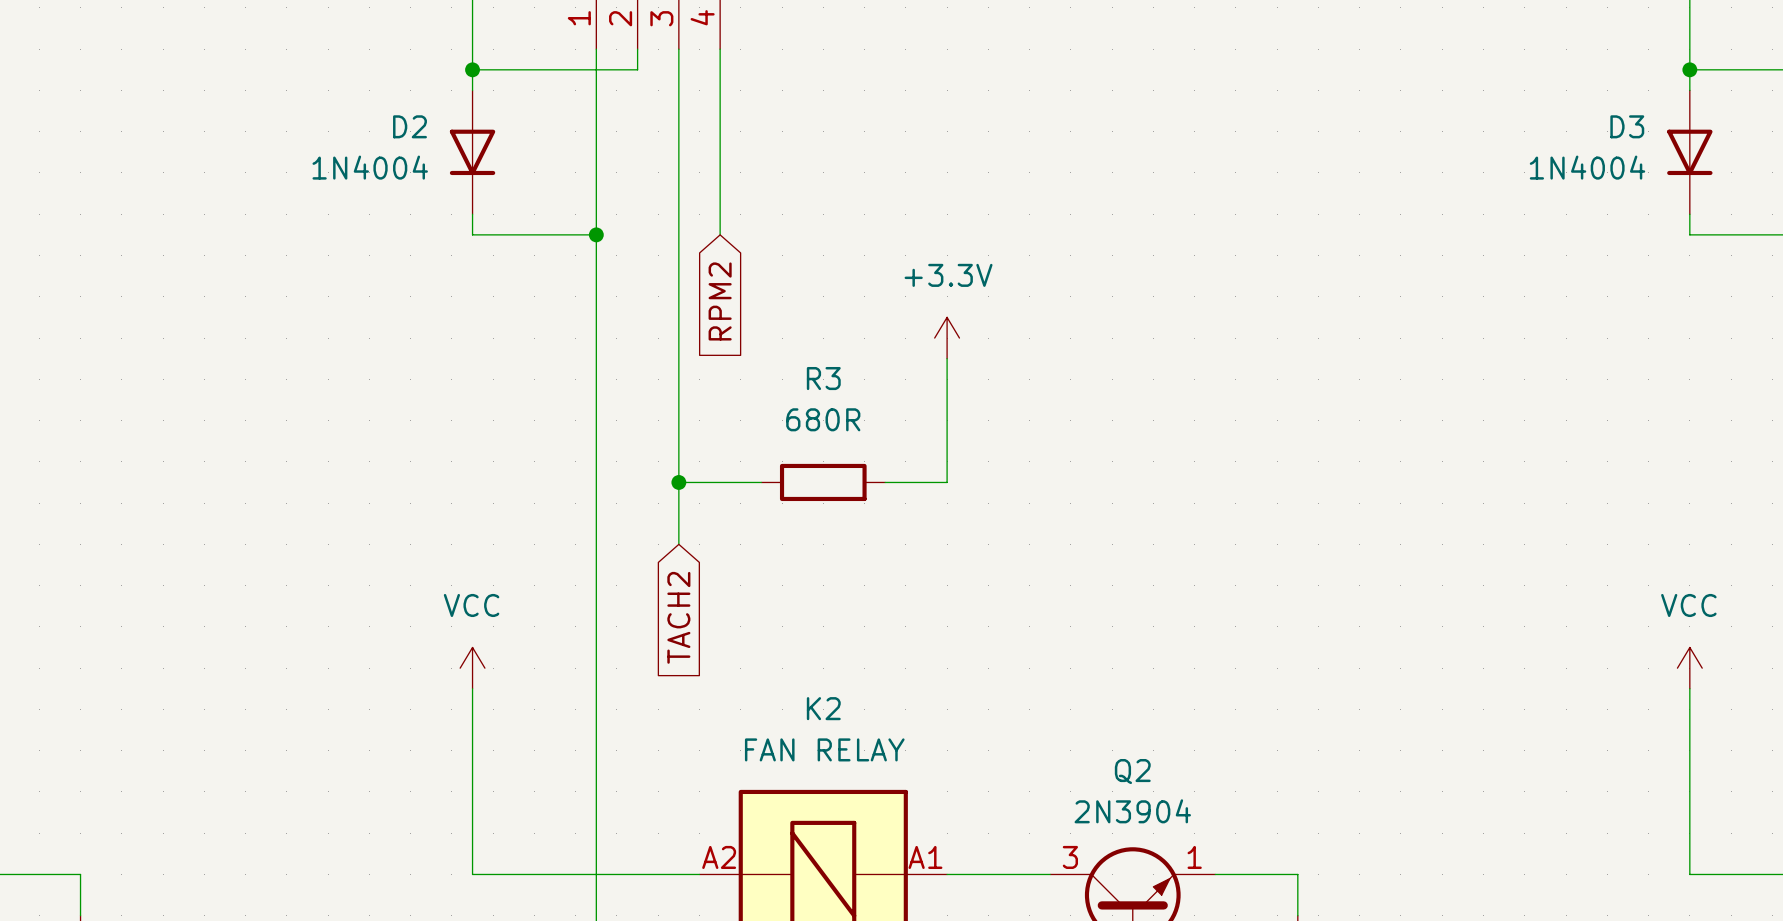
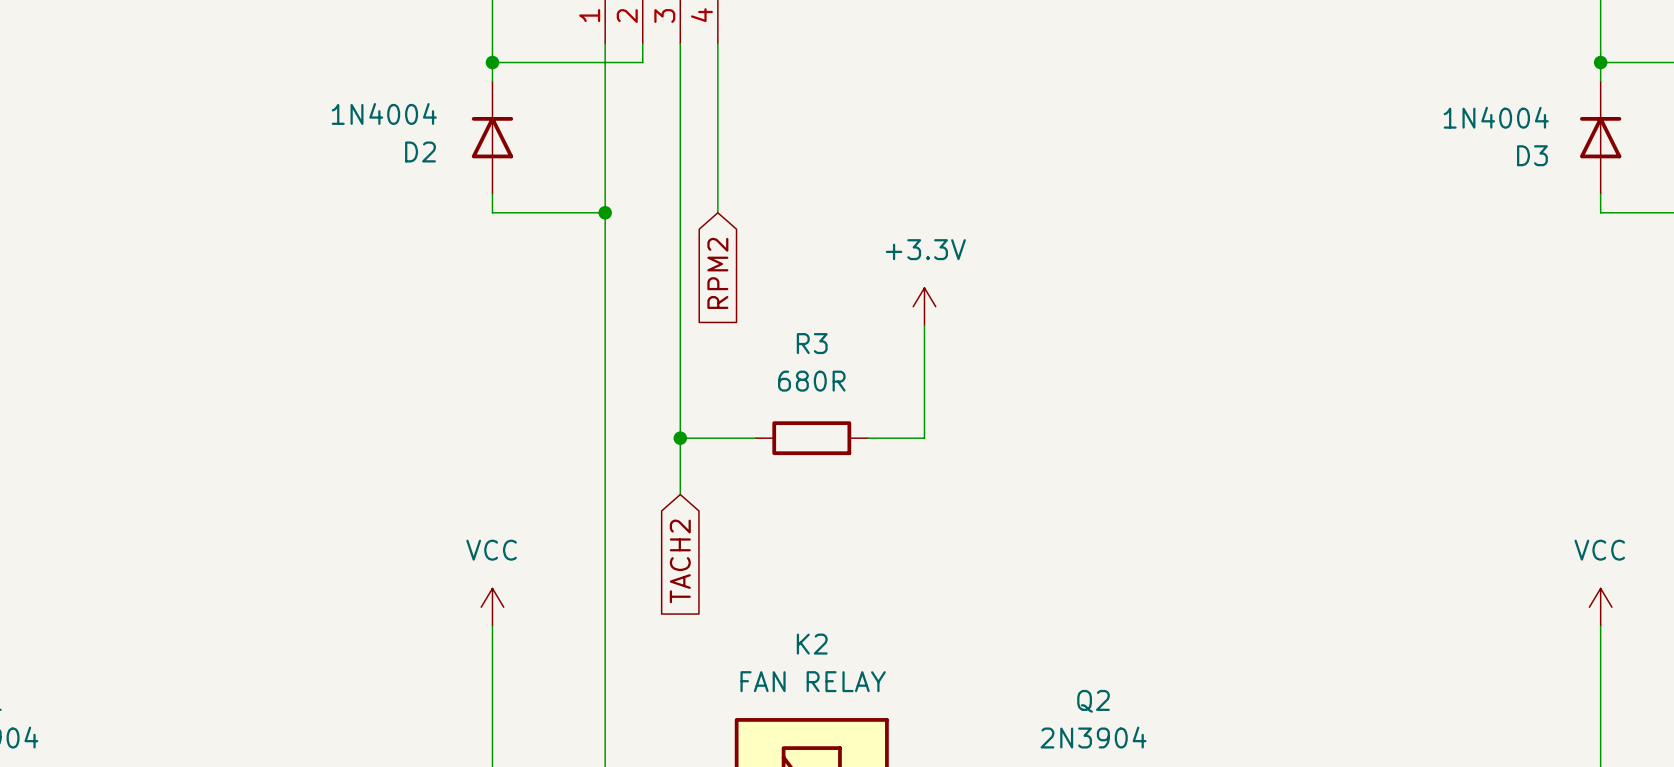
D2 name position: D2 (410, 126) -> D2 (420, 151)
D3 name position: D3 (1627, 126) -> D3 (1532, 155)
D2 rotation: 0° (472, 152) -> 180° (492, 137)
D3 rotation: 0° (1689, 152) -> 180° (1600, 137)
D2 value position: 1N4004 (370, 167) -> 1N4004 (384, 113)
D3 value position: 1N4004 (1587, 167) -> 1N4004 (1496, 117)

